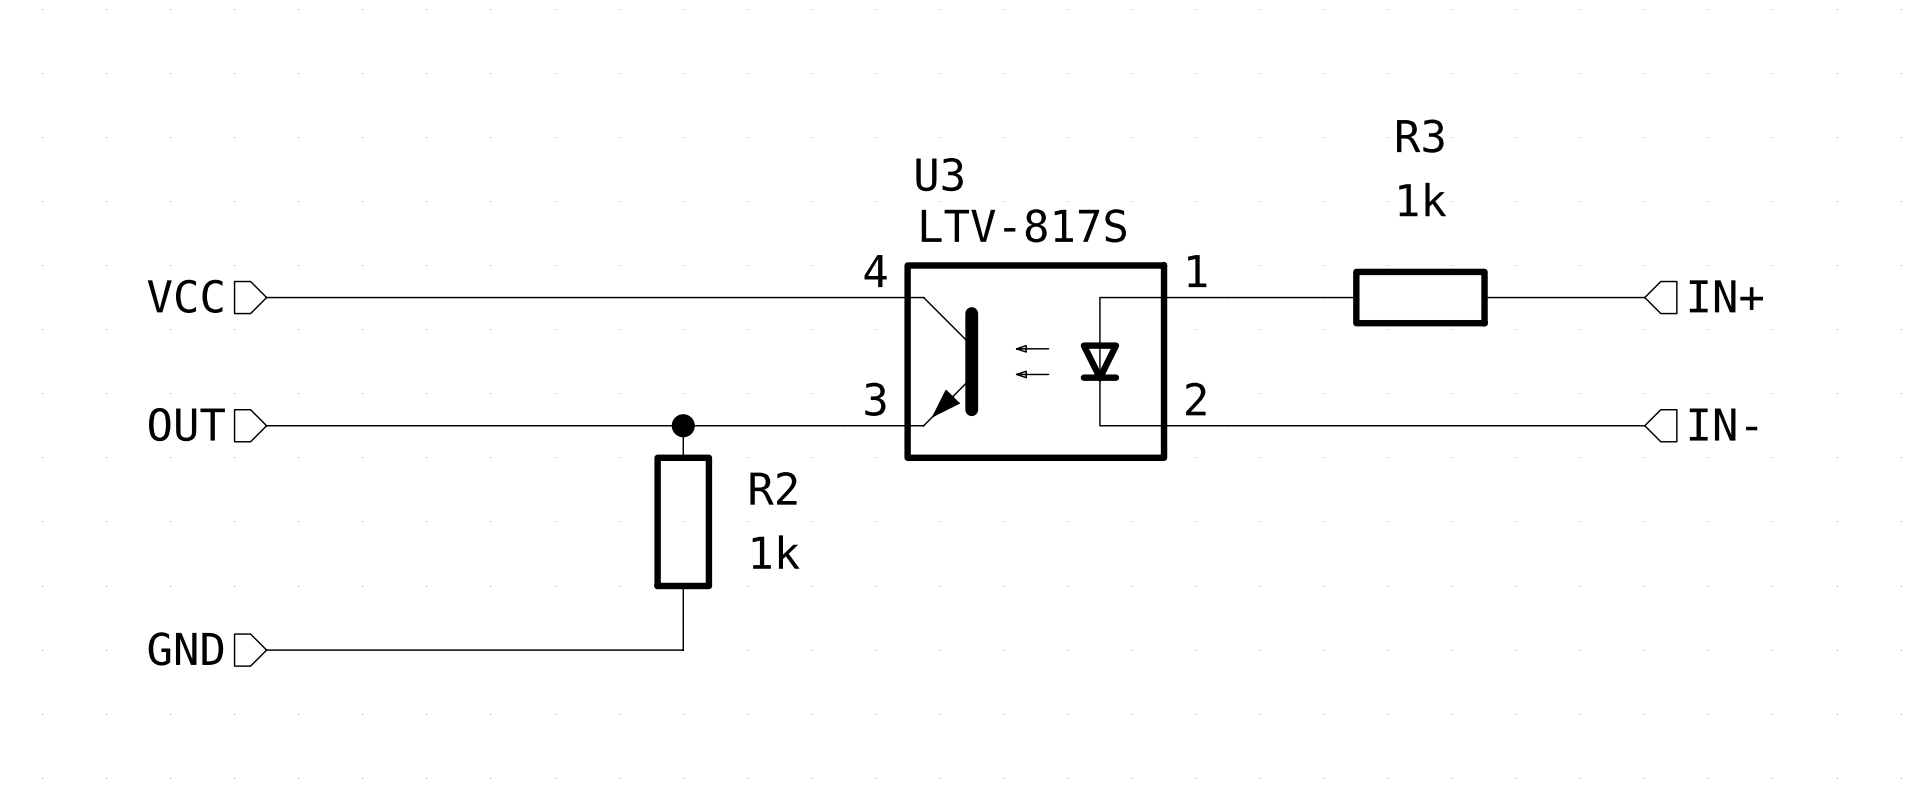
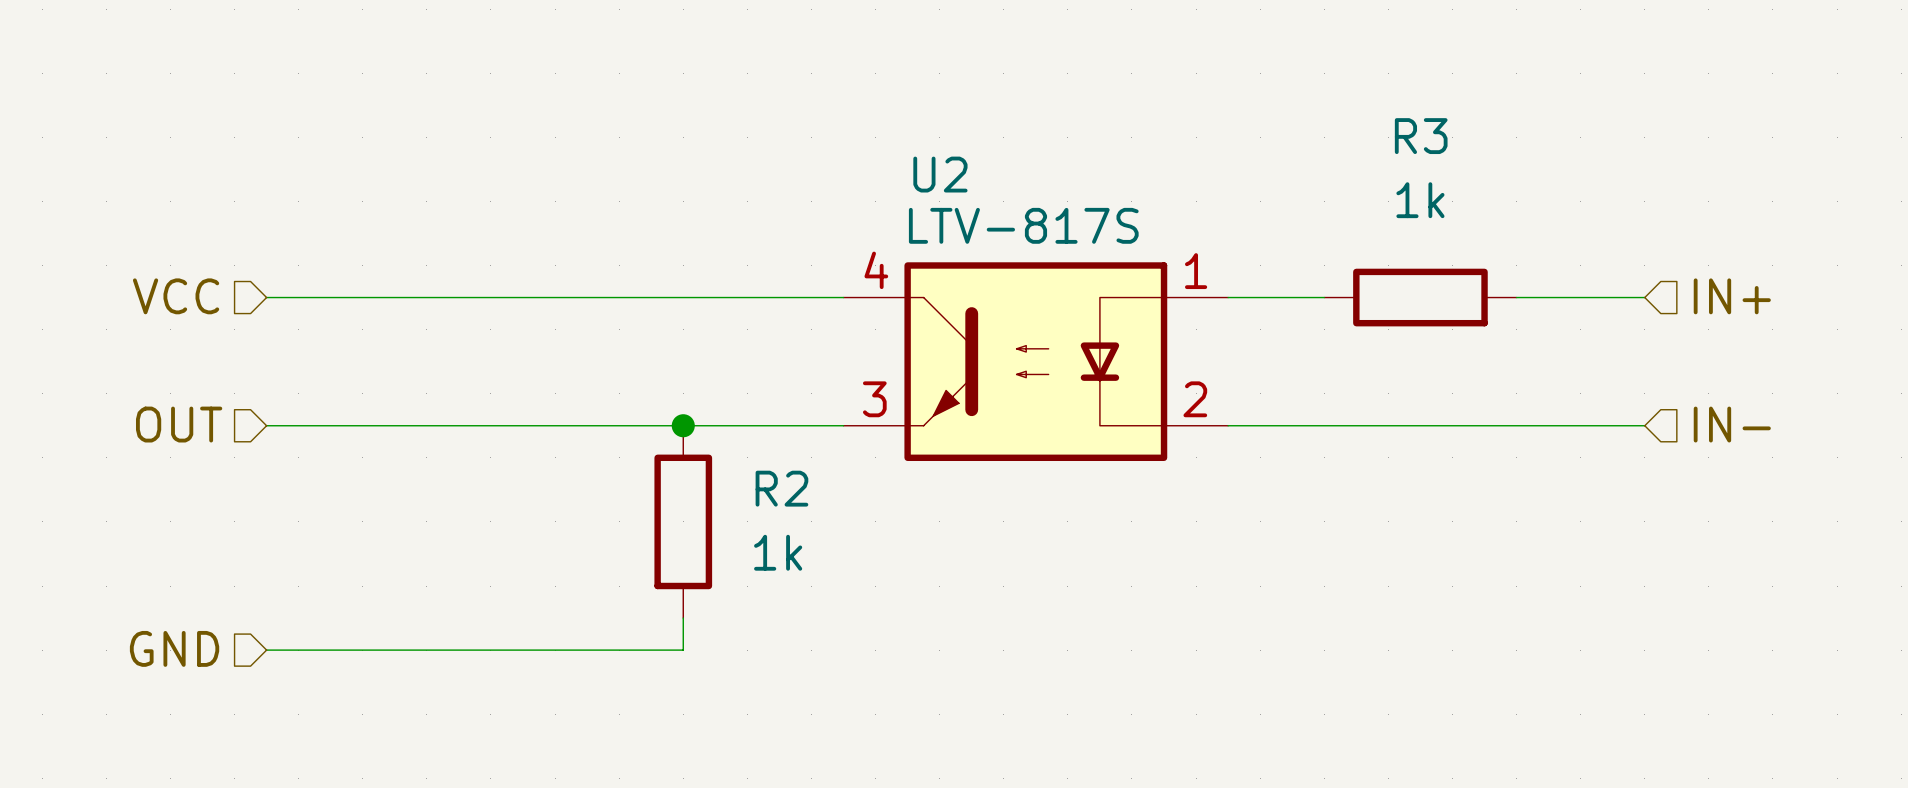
U3 name: U3 (939, 174) -> U2 (940, 174)

